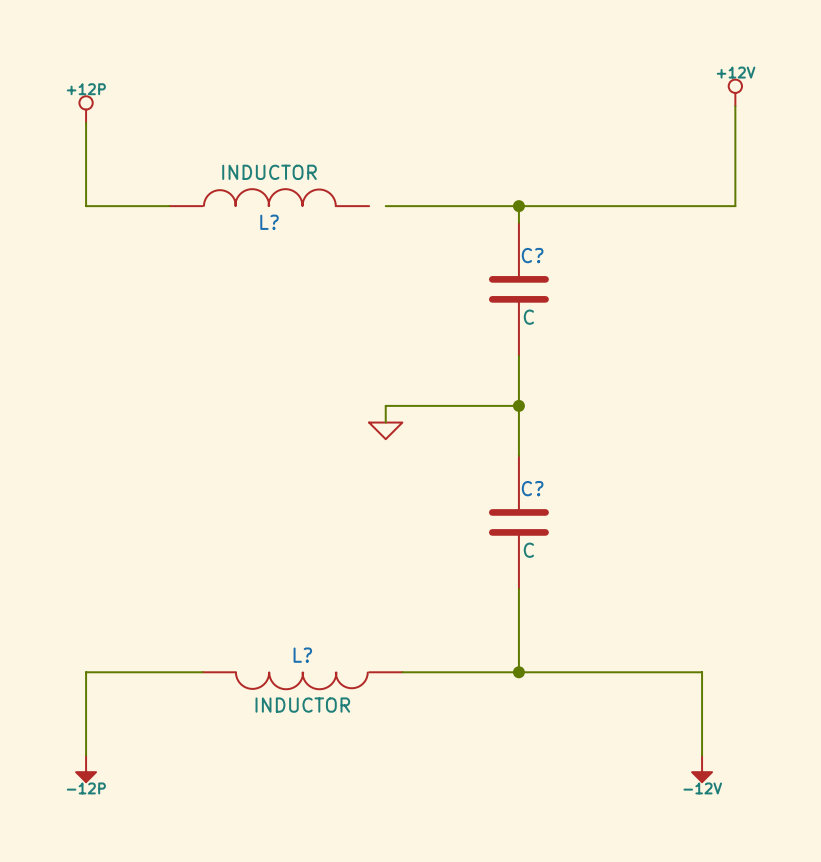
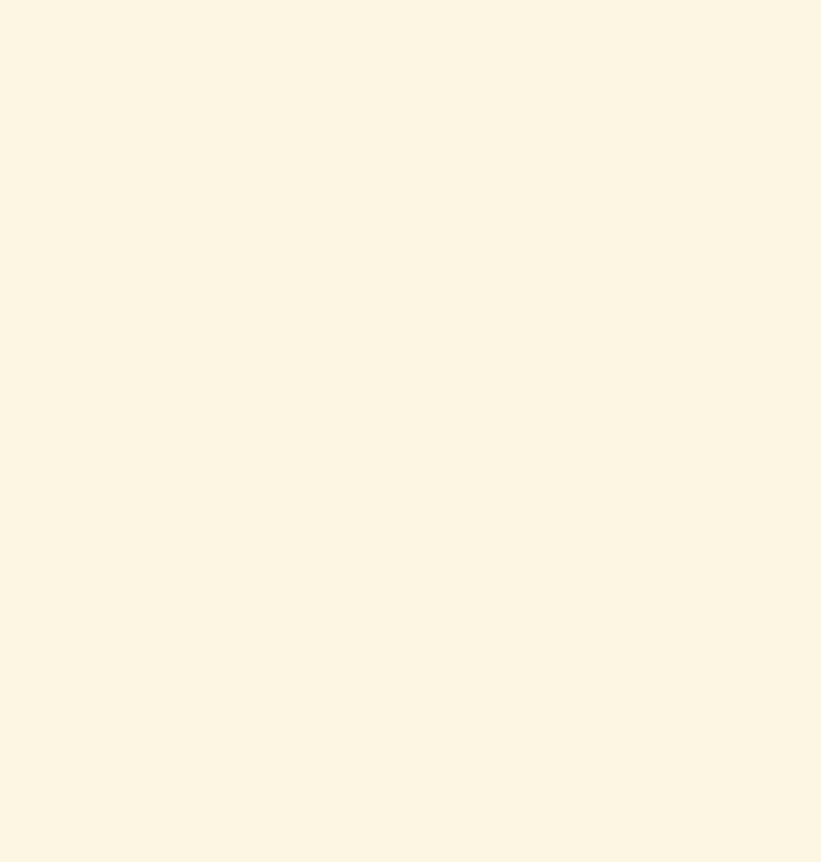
power symbol: +12V (735, 92) -> none
wire: (735, 106) (735, 206) (385, 206) -> none
power symbol: +12P (86, 109) -> none
wire: (86, 122) (86, 206) (169, 206) -> none
L?: INDUCTOR (269, 197) -> none
wire: (518, 206) (518, 222) -> none
junction: (518, 206) -> none
C?: C (518, 289) -> none
wire: (518, 355) (518, 455) -> none
wire: (518, 405) (385, 405) (385, 422) -> none
junction: (518, 405) -> none
power symbol: (385, 430) -> none
C?: C (518, 522) -> none
wire: (518, 589) (518, 672) -> none
wire: (202, 672) (86, 672) (86, 755) -> none
wire: (402, 672) (702, 672) (702, 755) -> none
junction: (518, 672) -> none
L?: INDUCTOR (302, 680) -> none
power symbol: -12P (86, 768) -> none
power symbol: -12V (702, 768) -> none

